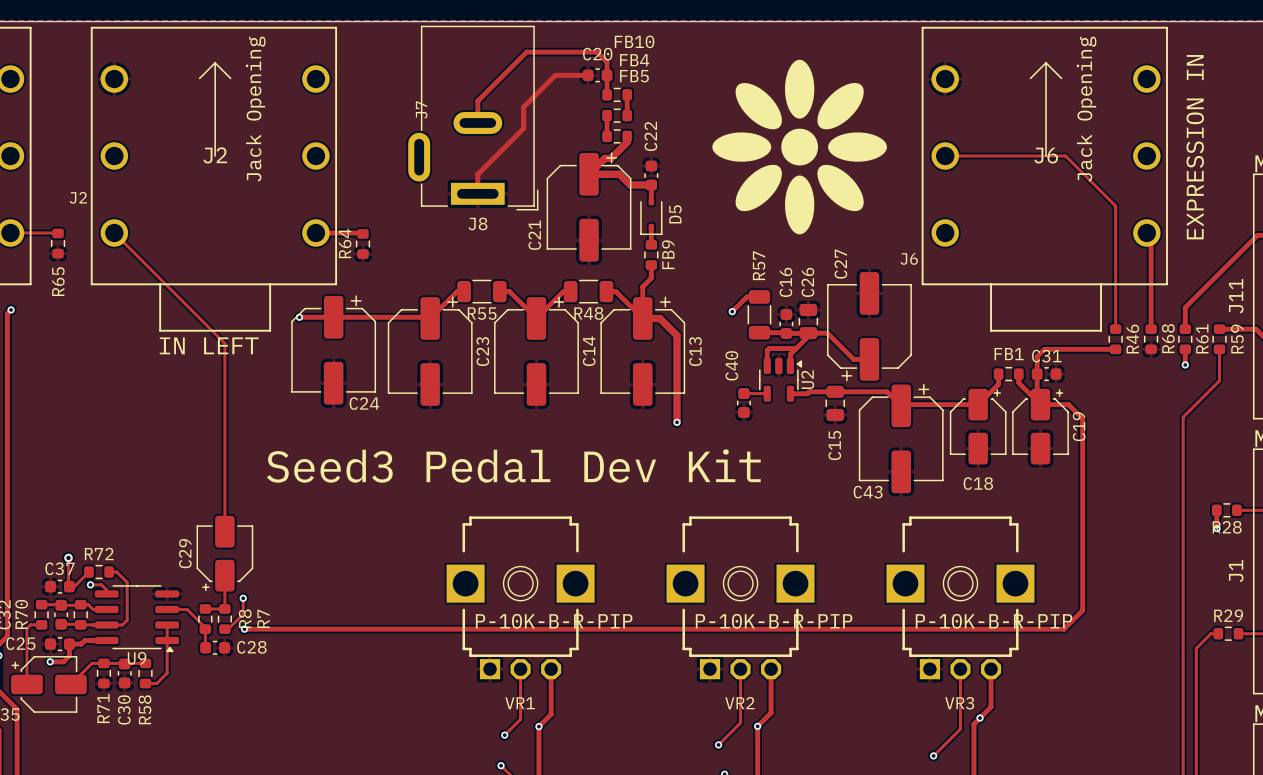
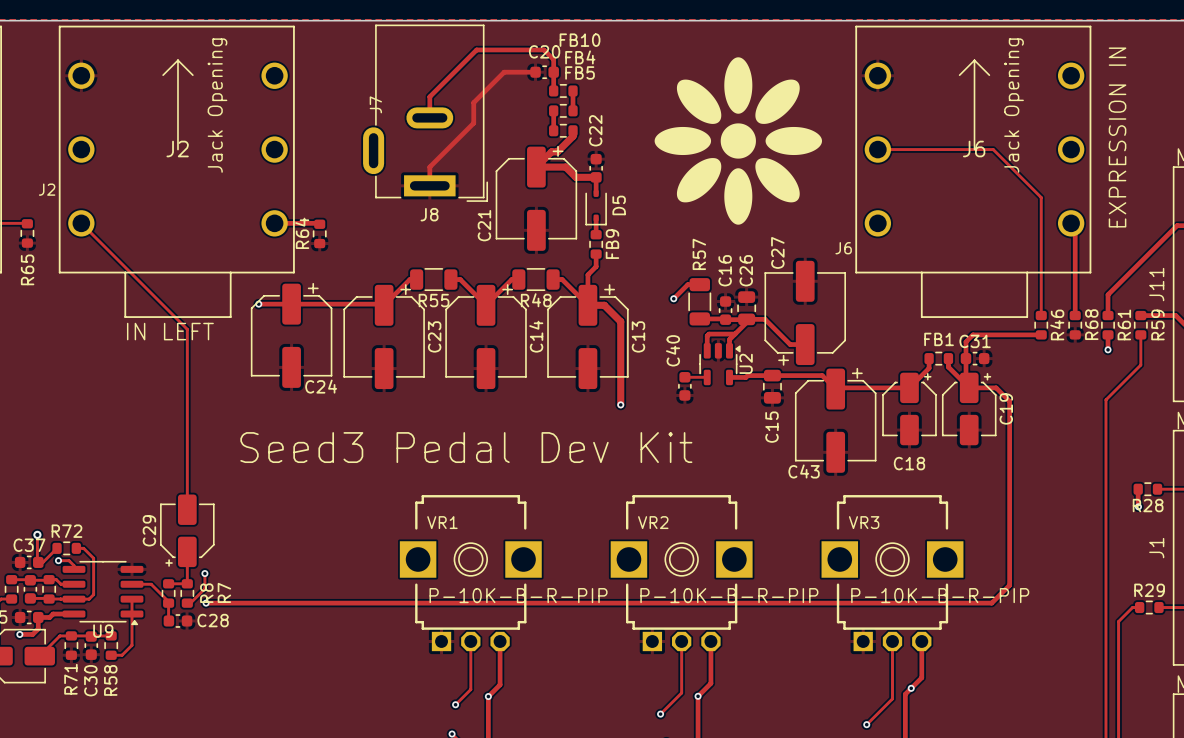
VR1 name position: VR1 (520, 703) -> VR1 (442, 522)
VR2 name position: VR2 (739, 703) -> VR2 (653, 522)
VR3 name position: VR3 (959, 703) -> VR3 (864, 522)

